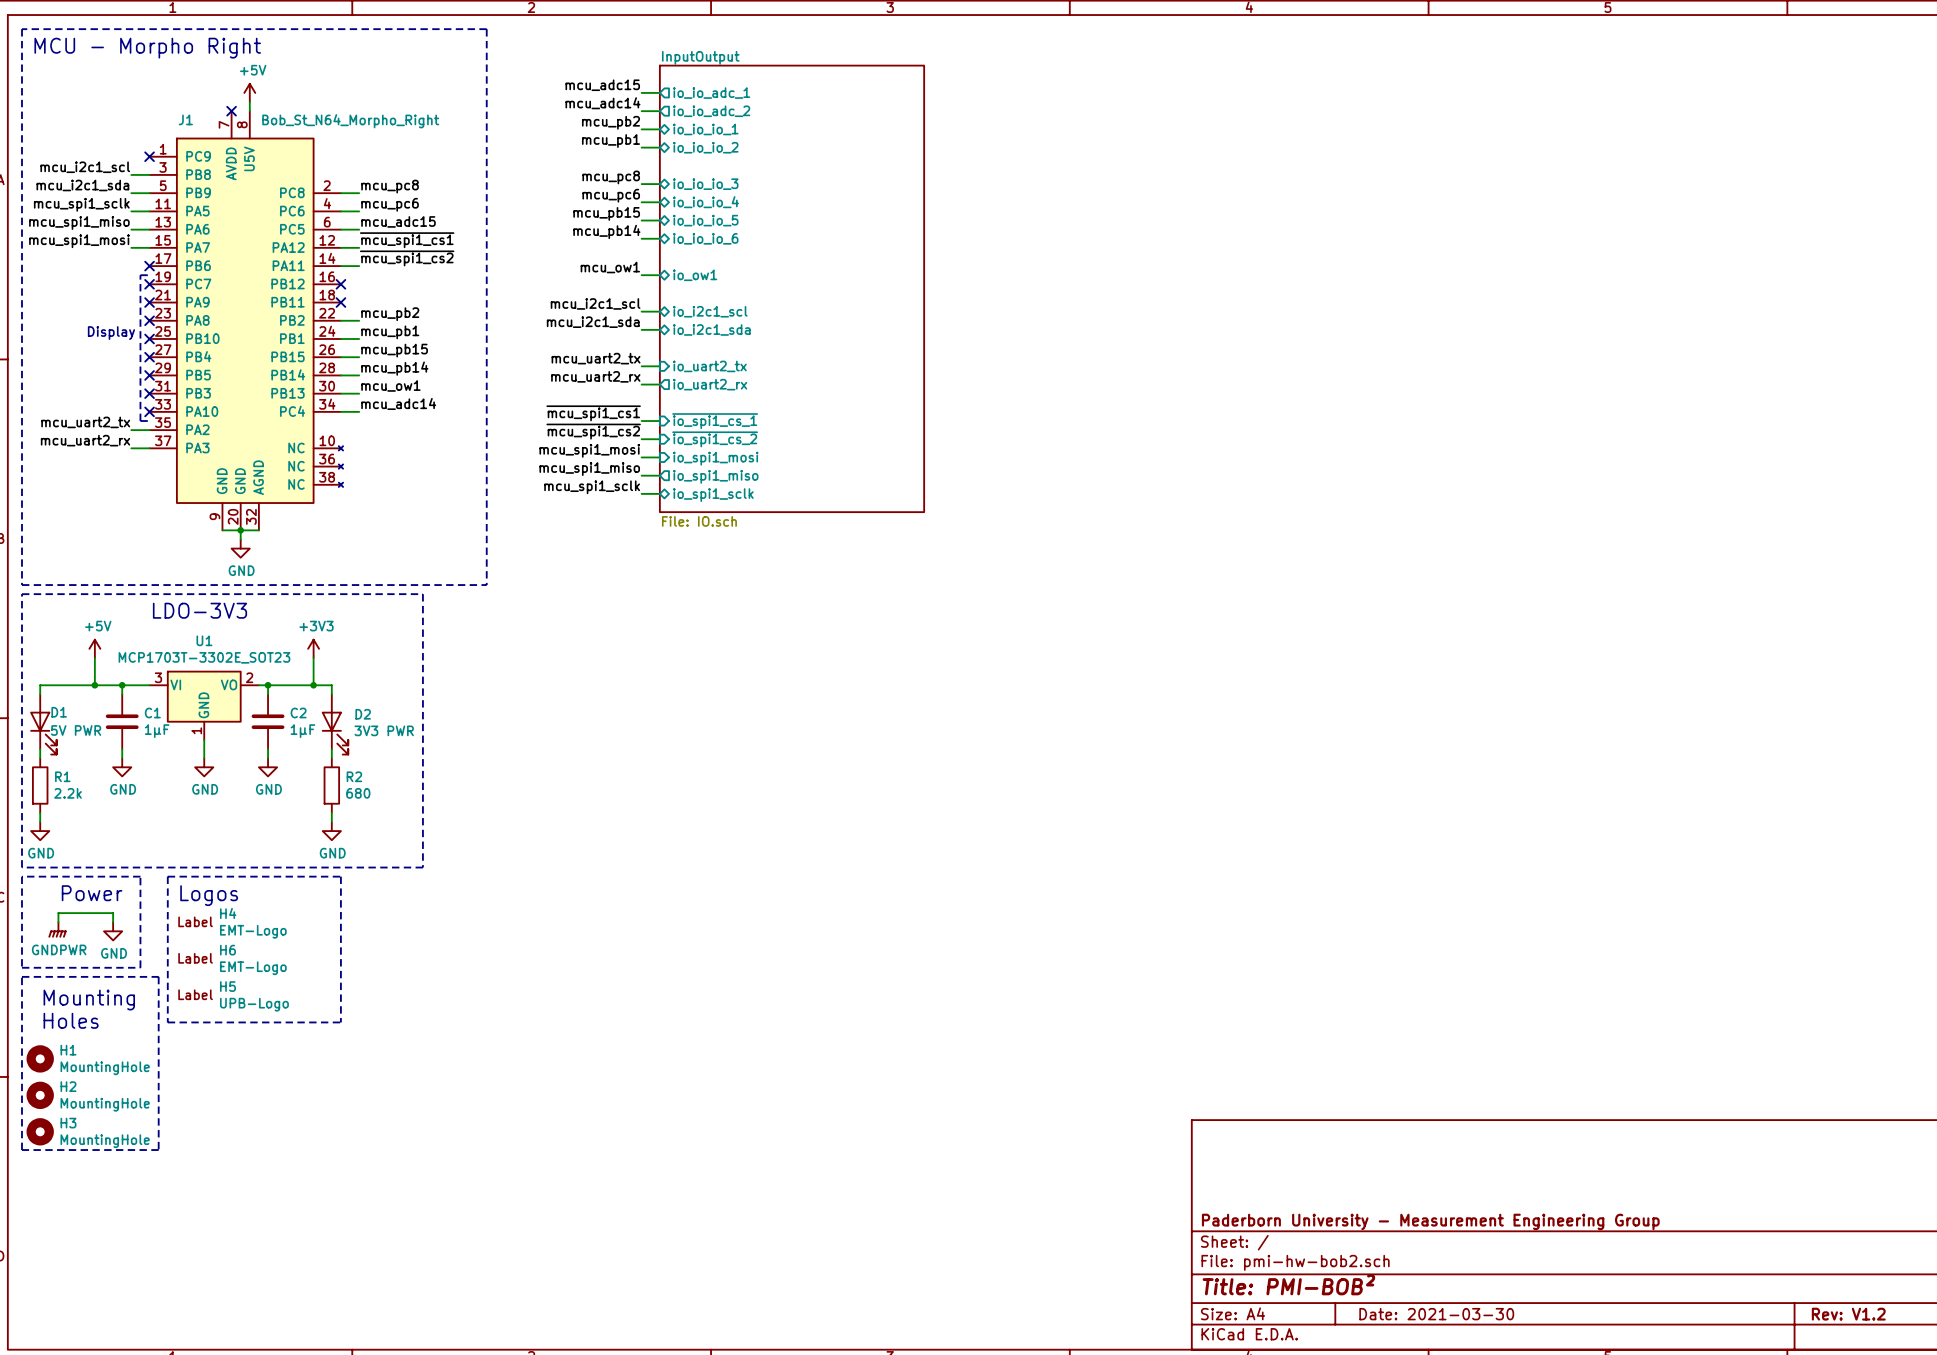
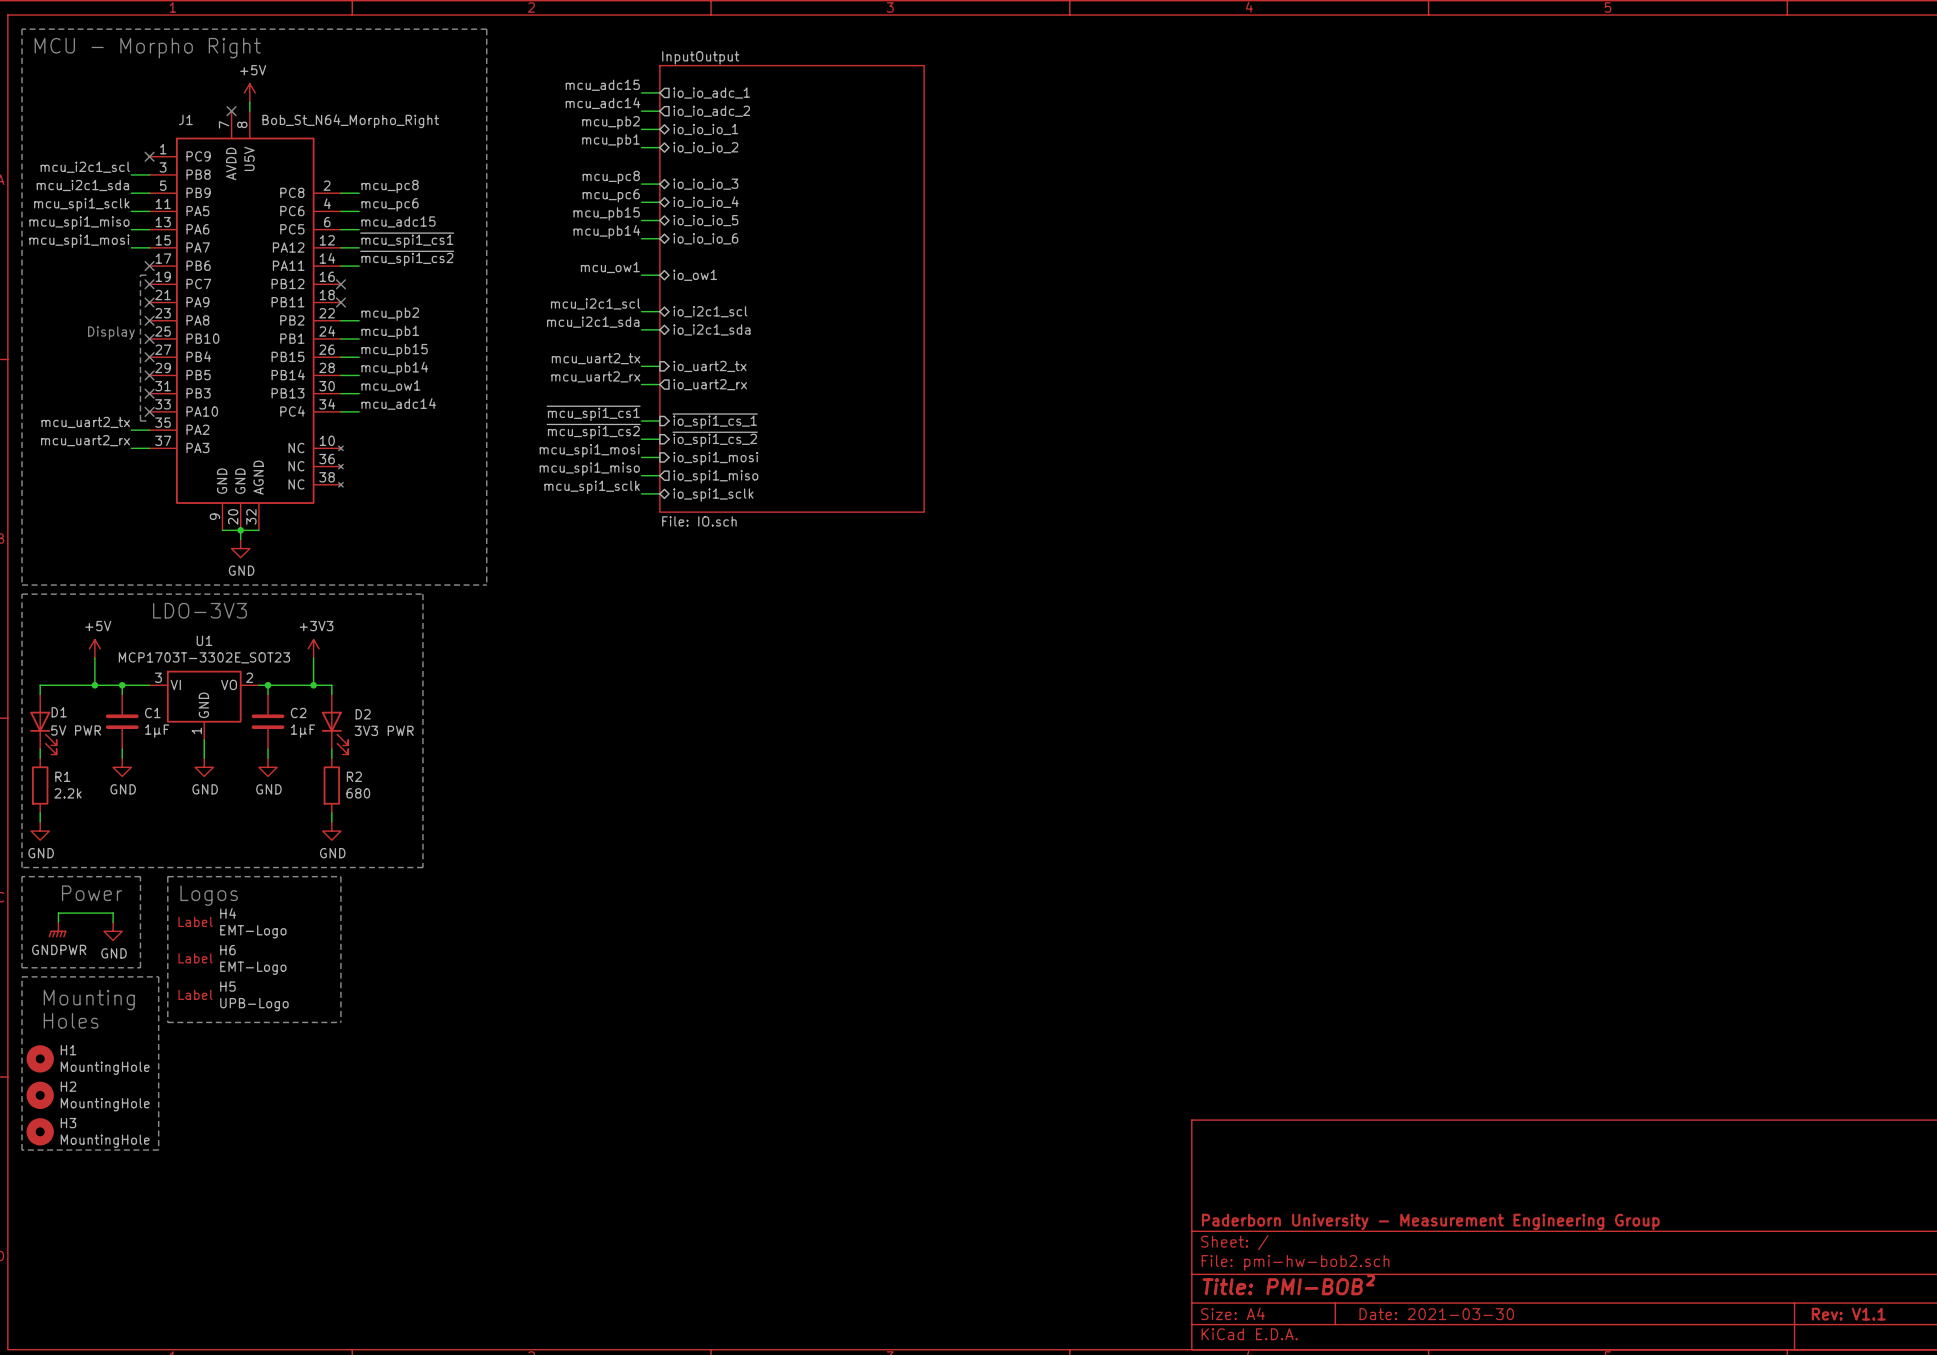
title block: Rev: V1.2 (1848, 1314) -> Rev: V1.1 (1848, 1314)

